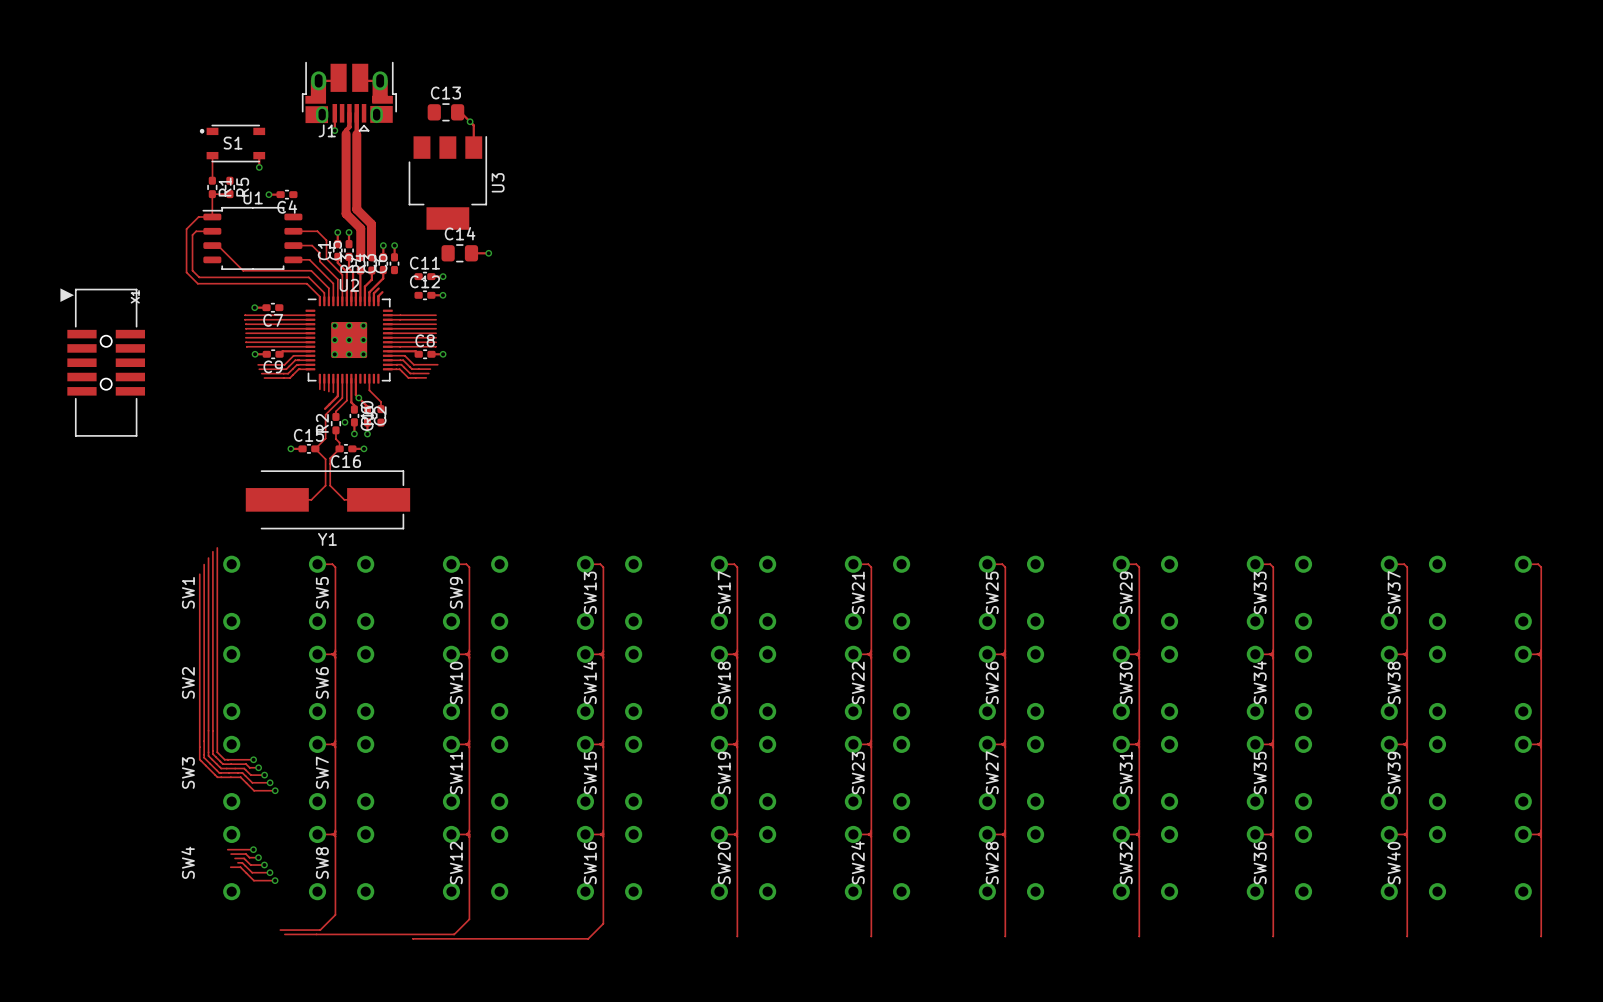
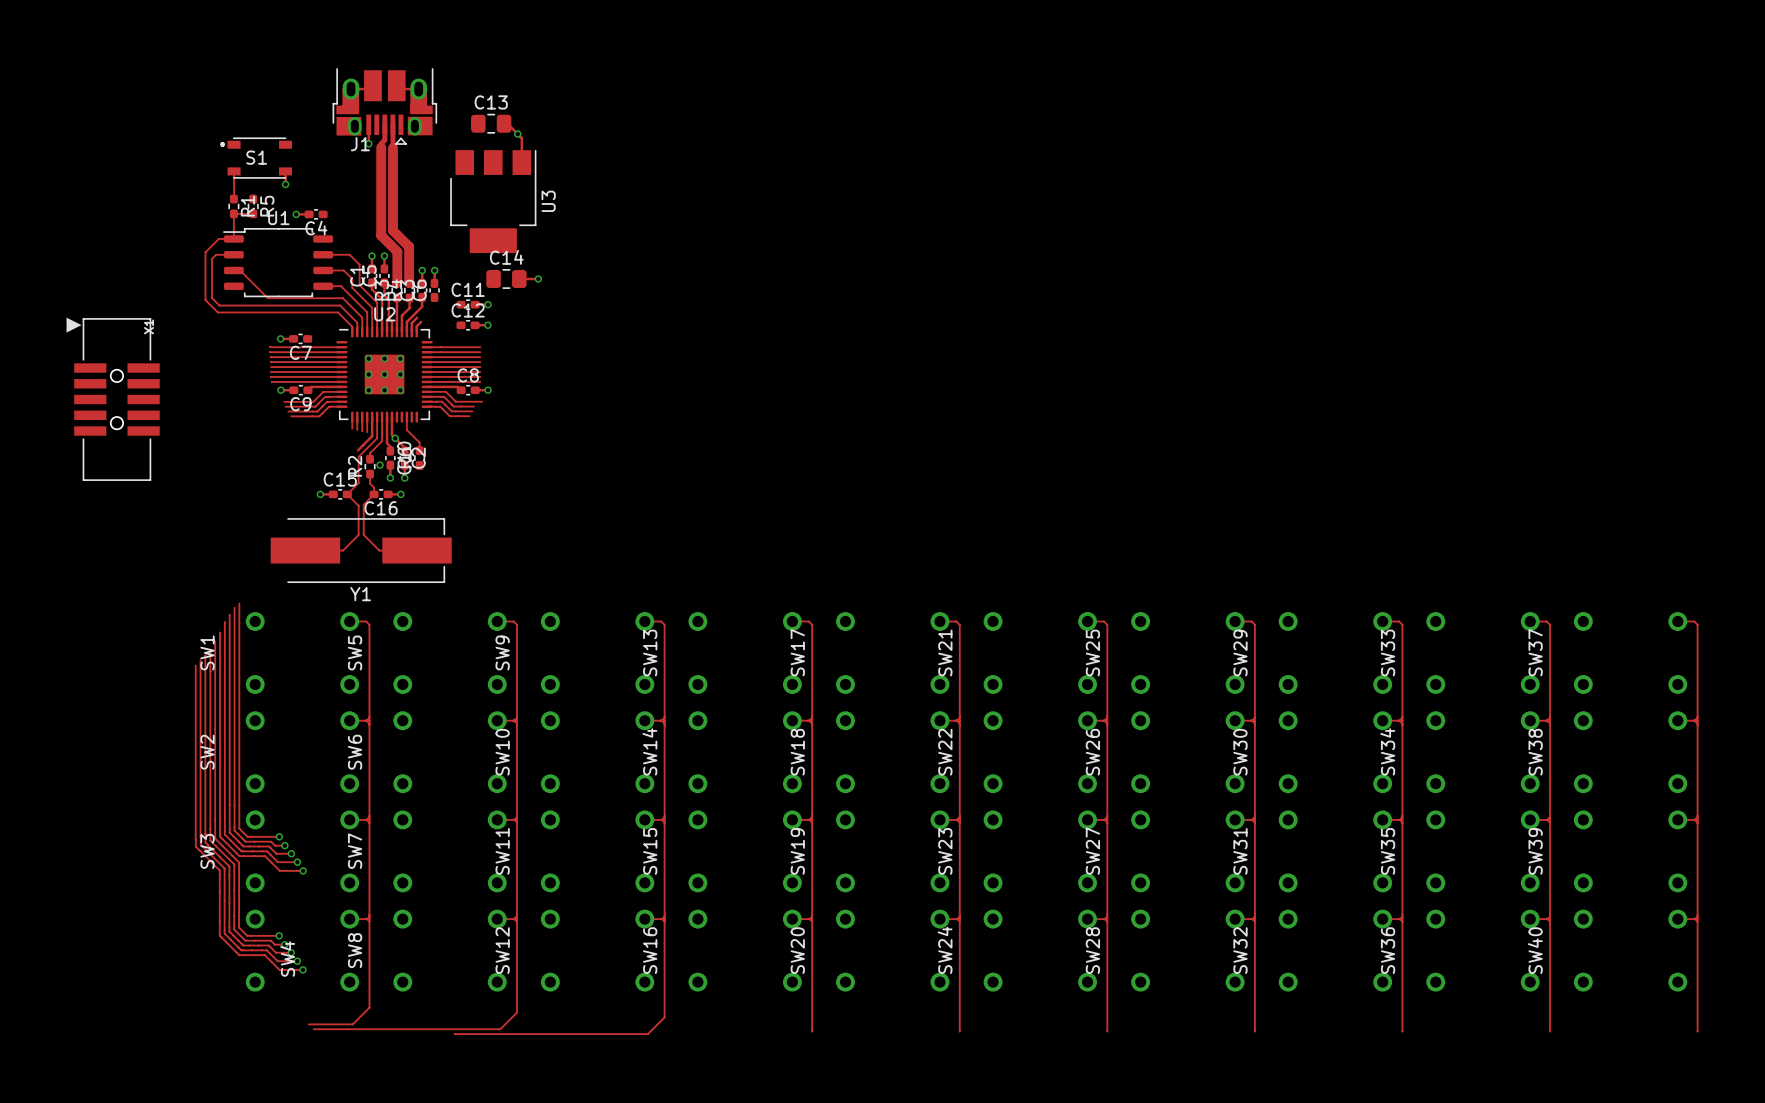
track: none -> (215, 641) (215, 838) (239, 862) (239, 927) (247, 935) (250, 935)
track: none -> (210, 651) (210, 671)
track: none -> (205, 655) (205, 833)
track: none -> (200, 660) (200, 836)
track: none -> (195, 665) (195, 839)
track: none -> (210, 671) (210, 840) (234, 864) (234, 929) (245, 940) (254, 940)
track: none -> (205, 834) (205, 842) (229, 866) (229, 931) (243, 945) (258, 945)
track: none -> (200, 836) (200, 844) (224, 868) (224, 933) (241, 950) (262, 950)
track: none -> (195, 839) (195, 846) (219, 870) (219, 935) (239, 955) (254, 955)
SW4 name position: SW4 (188, 862) -> SW4 (287, 959)

